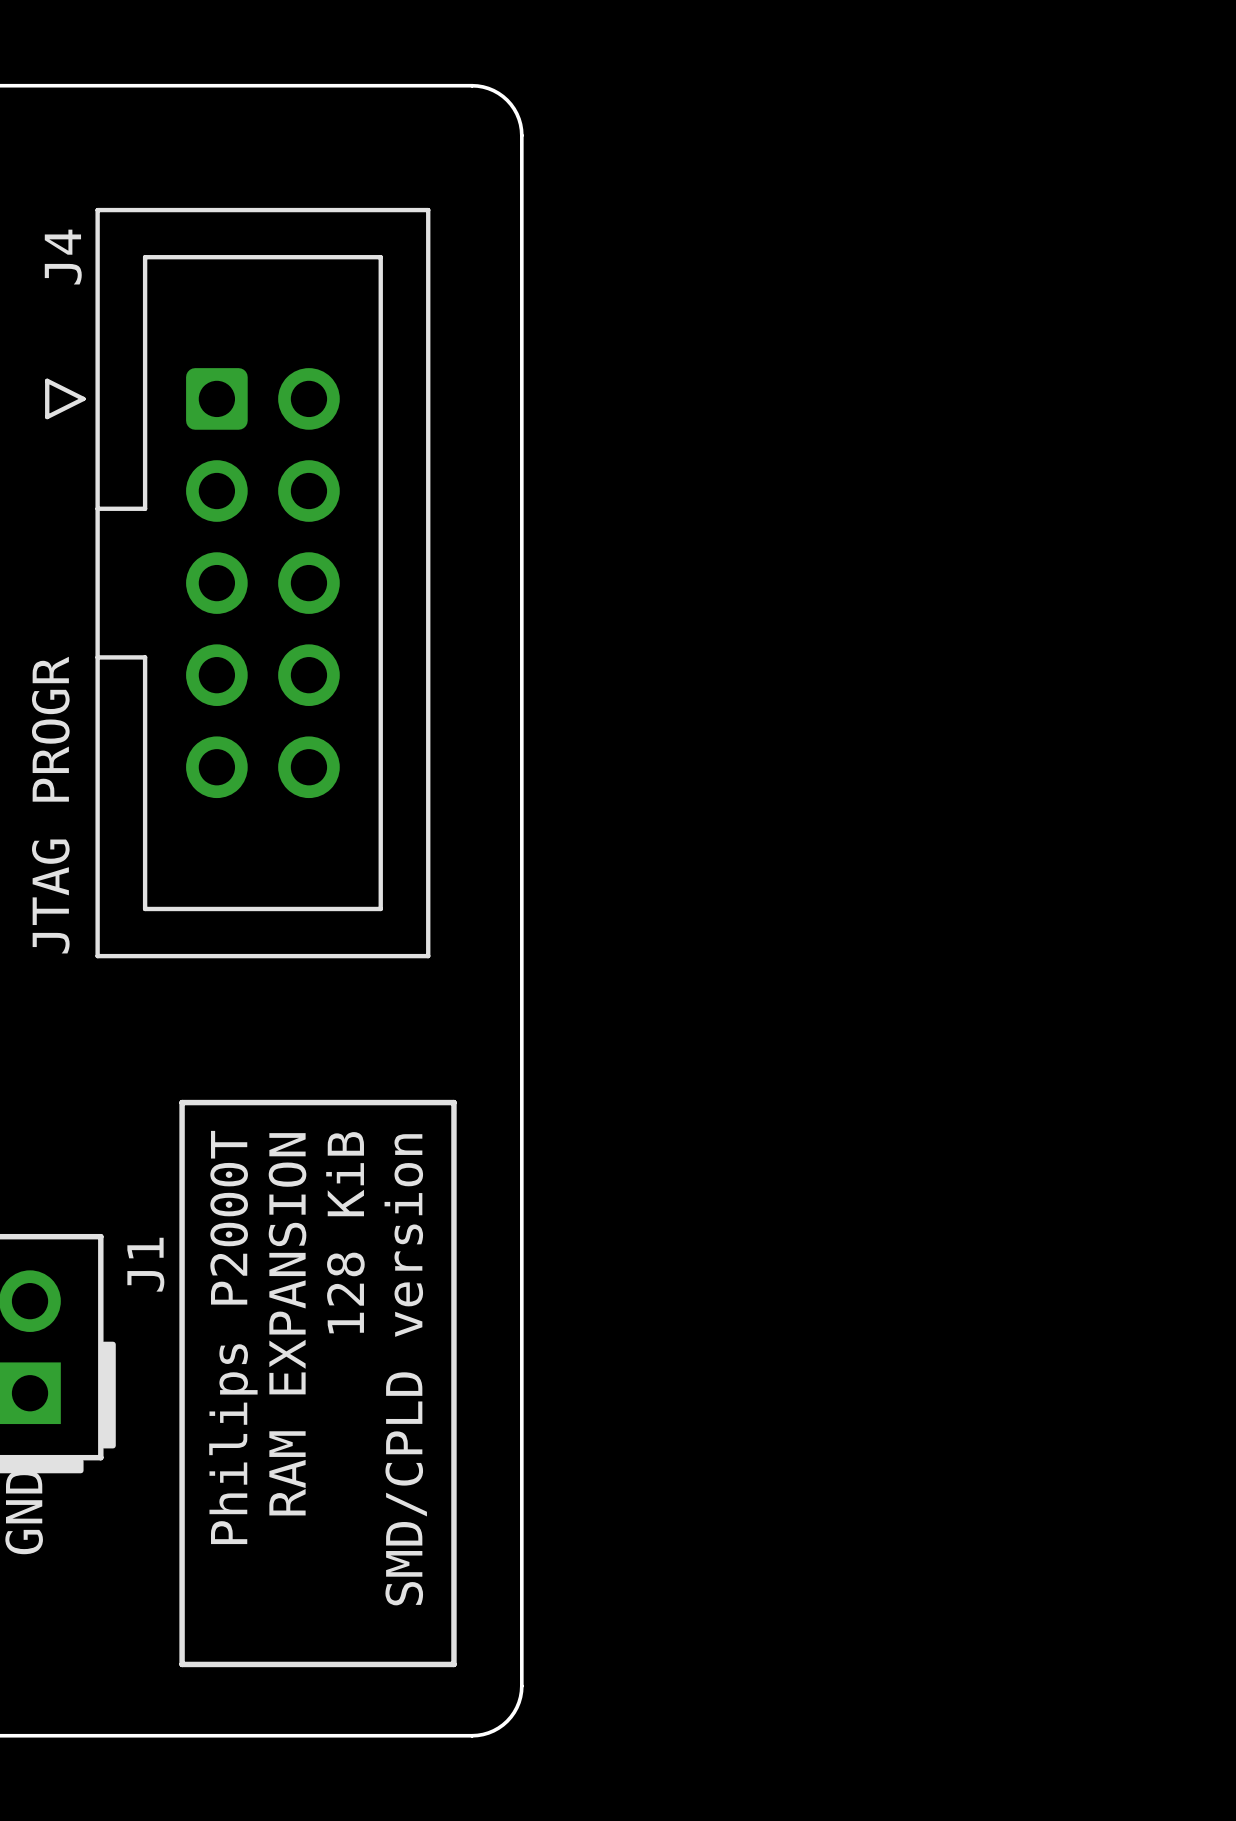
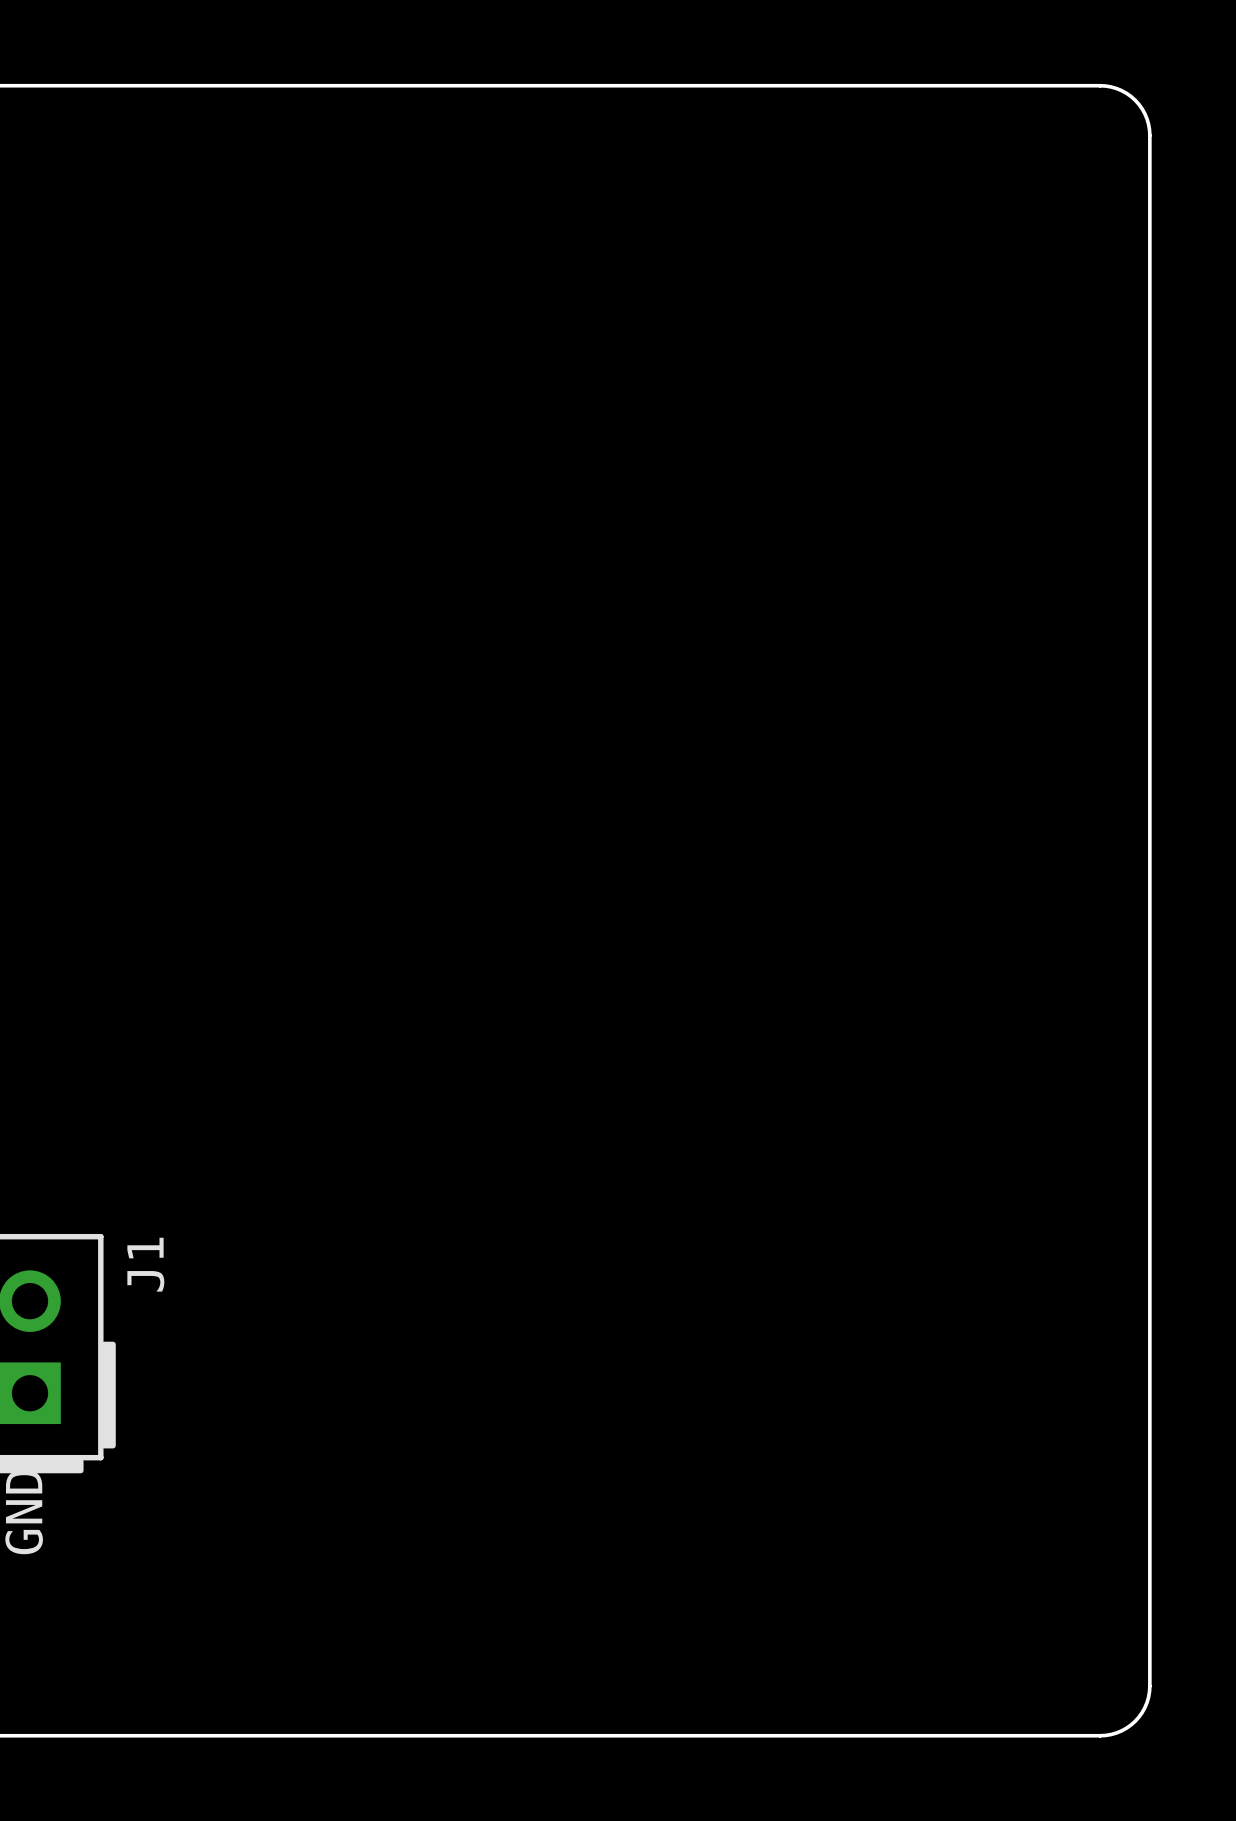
board edge: (472, 85) (493, 90) (507, 100) (516, 113) (521, 135) (521, 1686) (519, 1702) (507, 1721) (488, 1732) (472, 1735) -> (472, 85) (1105, 86) (1121, 90) (1139, 104) (1147, 119) (1149, 135) (1149, 1686) (1144, 1707) (1135, 1721) (1126, 1728) (1116, 1732) (1100, 1735) (472, 1735)
J4: (237, 583) -> none
text: JTAG PROGR (50, 805) -> none
line: (182, 1102) (453, 1102) (453, 1664) (182, 1664) (182, 1102) -> none
text: 128 KiB (345, 1232) -> none
text: RAM EXPANSION (287, 1324) -> none
text: Philips P2000T (233, 1337) -> none
text: SMD/CPLD version (405, 1369) -> none

